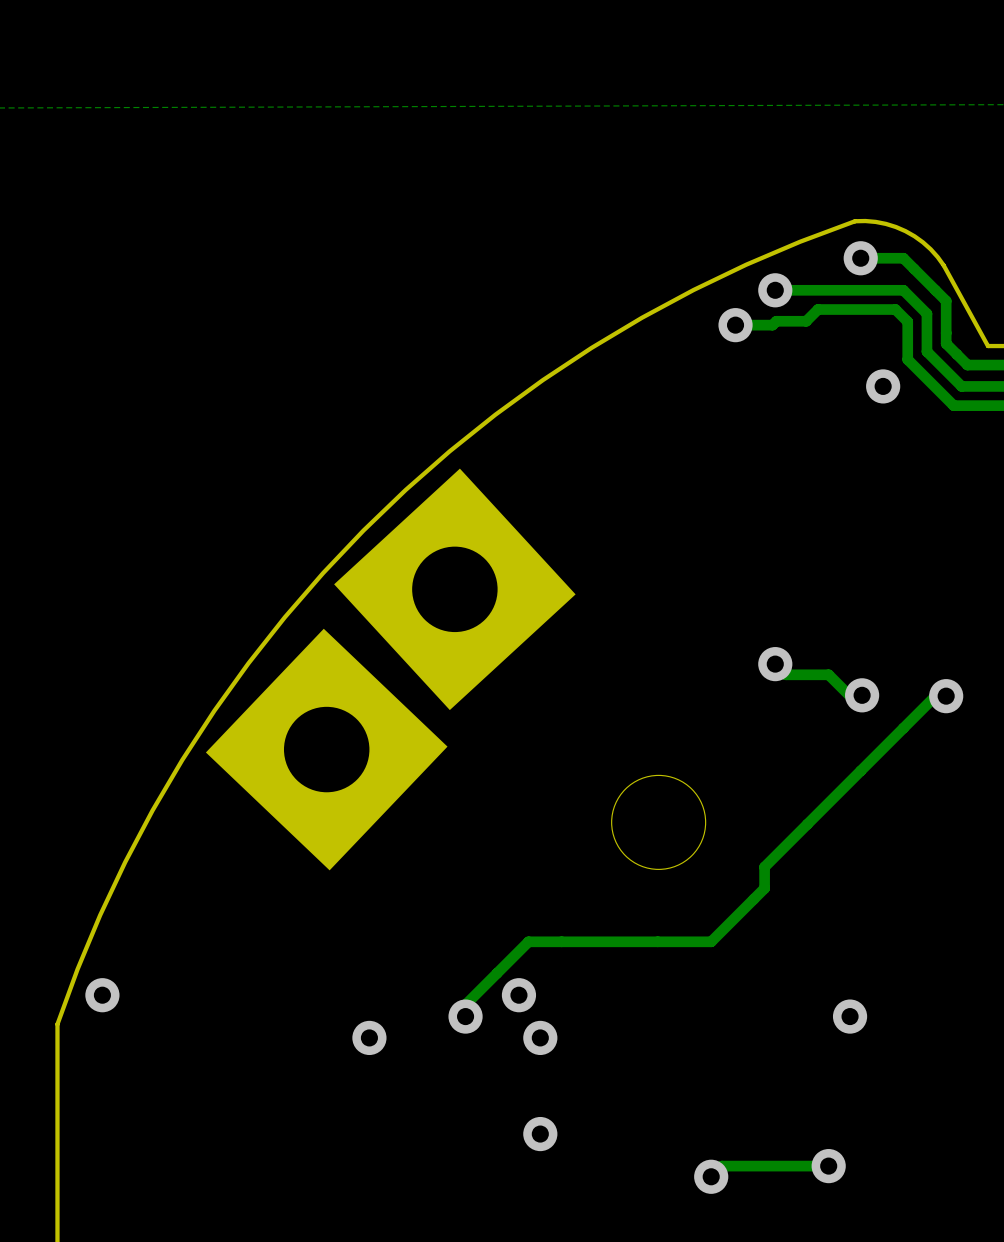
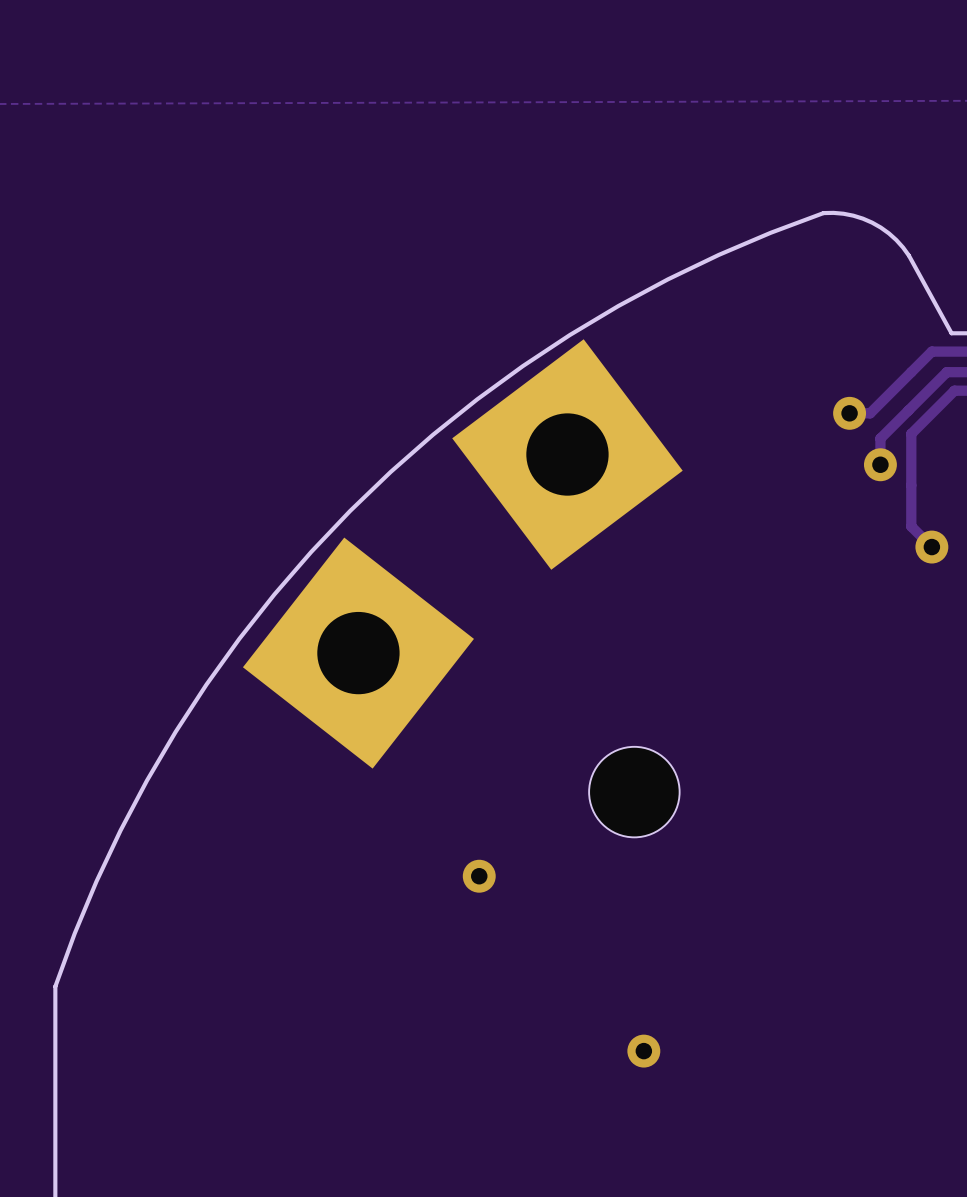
track: (860, 258) (903, 258) (946, 300) (946, 343) (967, 365) -> (849, 413) (870, 413) (931, 351)
via: (860, 258) -> none
track: (775, 290) (903, 290) (926, 313) (926, 351) (961, 386) (983, 386) -> (880, 464) (880, 438) (946, 372)
via: (775, 290) -> none
track: (735, 325) (772, 325) (776, 321) (806, 321) (818, 309) (895, 309) (907, 321) (907, 359) (953, 405) (991, 405) -> (931, 547) (911, 526) (911, 433) (954, 390)
via: (735, 325) -> none
via position: (883, 386) -> (849, 413)
part: none -> (567, 454)
via: none -> (880, 464)
via: none -> (931, 547)
part: (454, 589) -> none
track: (775, 664) (785, 674) (828, 674) (850, 696) (860, 696) -> none
via: (775, 664) -> none
part: none -> (358, 653)
via: (862, 695) -> none
track: (946, 696) (935, 696) (764, 867) (764, 888) (711, 941) (528, 941) (465, 1004) (465, 1016) -> none
via: (946, 696) -> none
part: (326, 749) -> none
via: none -> (479, 876)
via: (102, 995) -> none
via: (518, 995) -> none
via: (465, 1016) -> none
via: (850, 1016) -> none
via: (369, 1037) -> none
via: (540, 1037) -> none
via: none -> (643, 1051)
via: (540, 1134) -> none
track: (828, 1166) (721, 1166) (711, 1176) -> none
via: (828, 1166) -> none
via: (711, 1176) -> none

